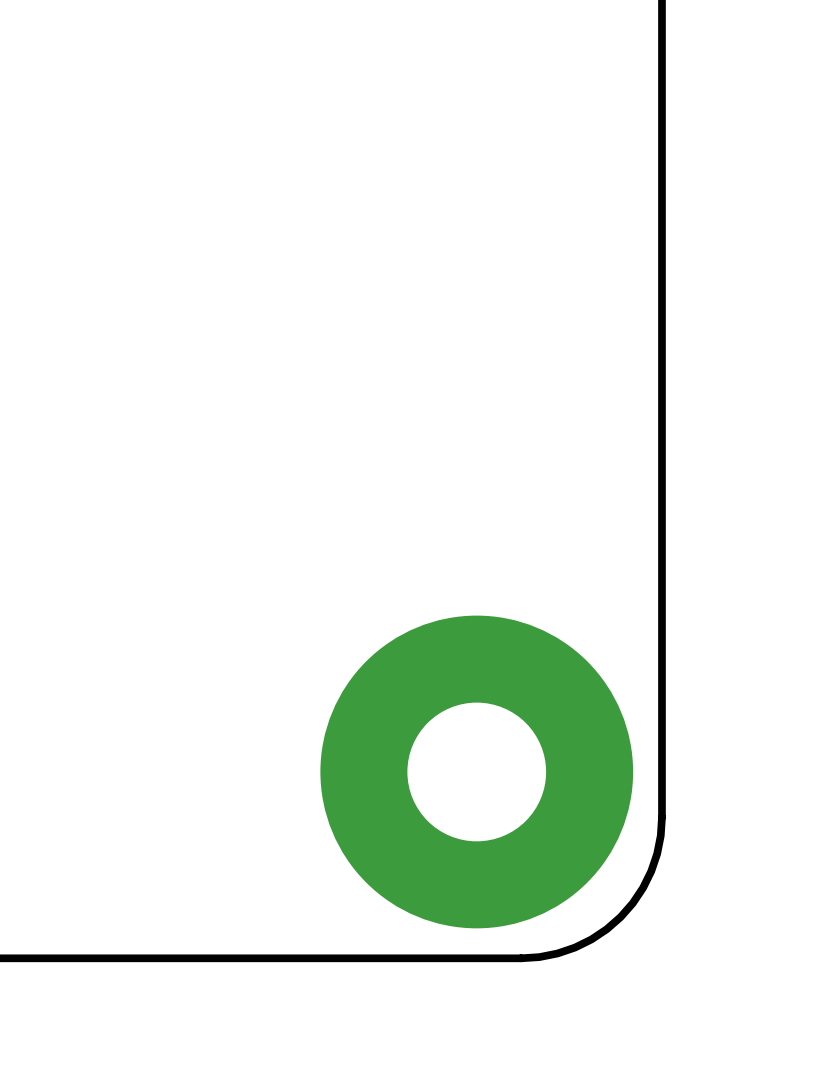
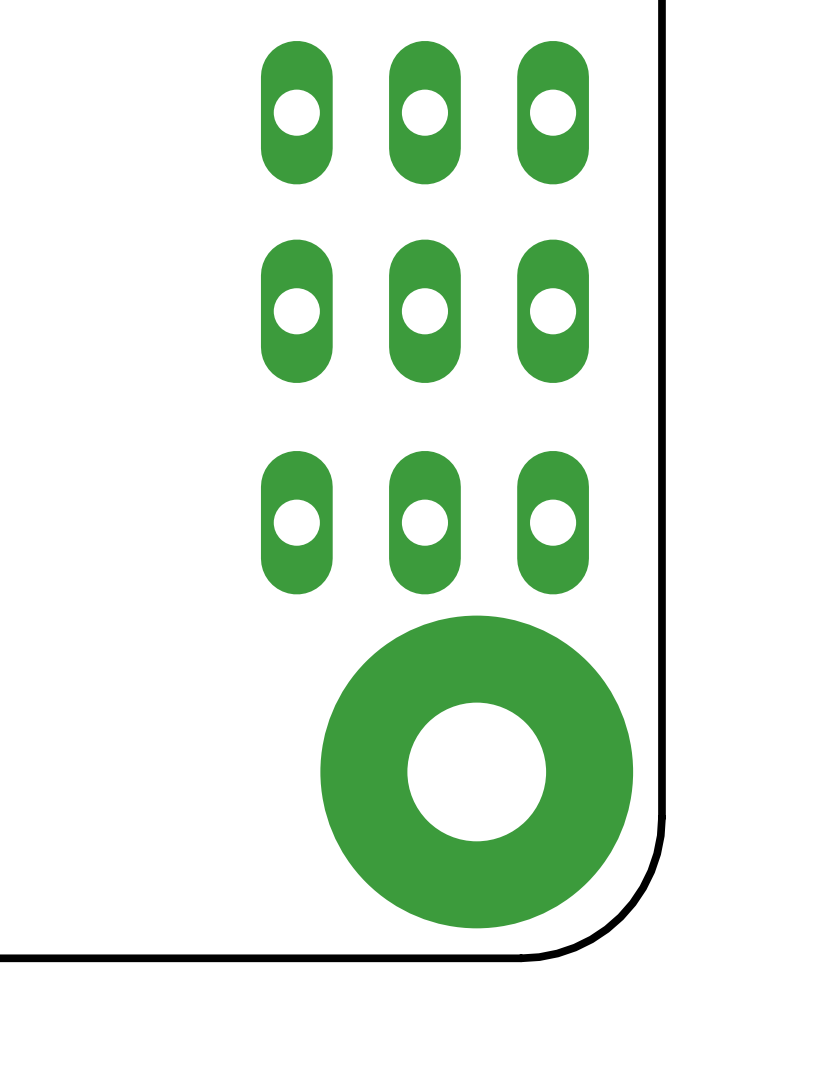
part: none -> (424, 112)
part: none -> (424, 311)
part: none -> (424, 522)

